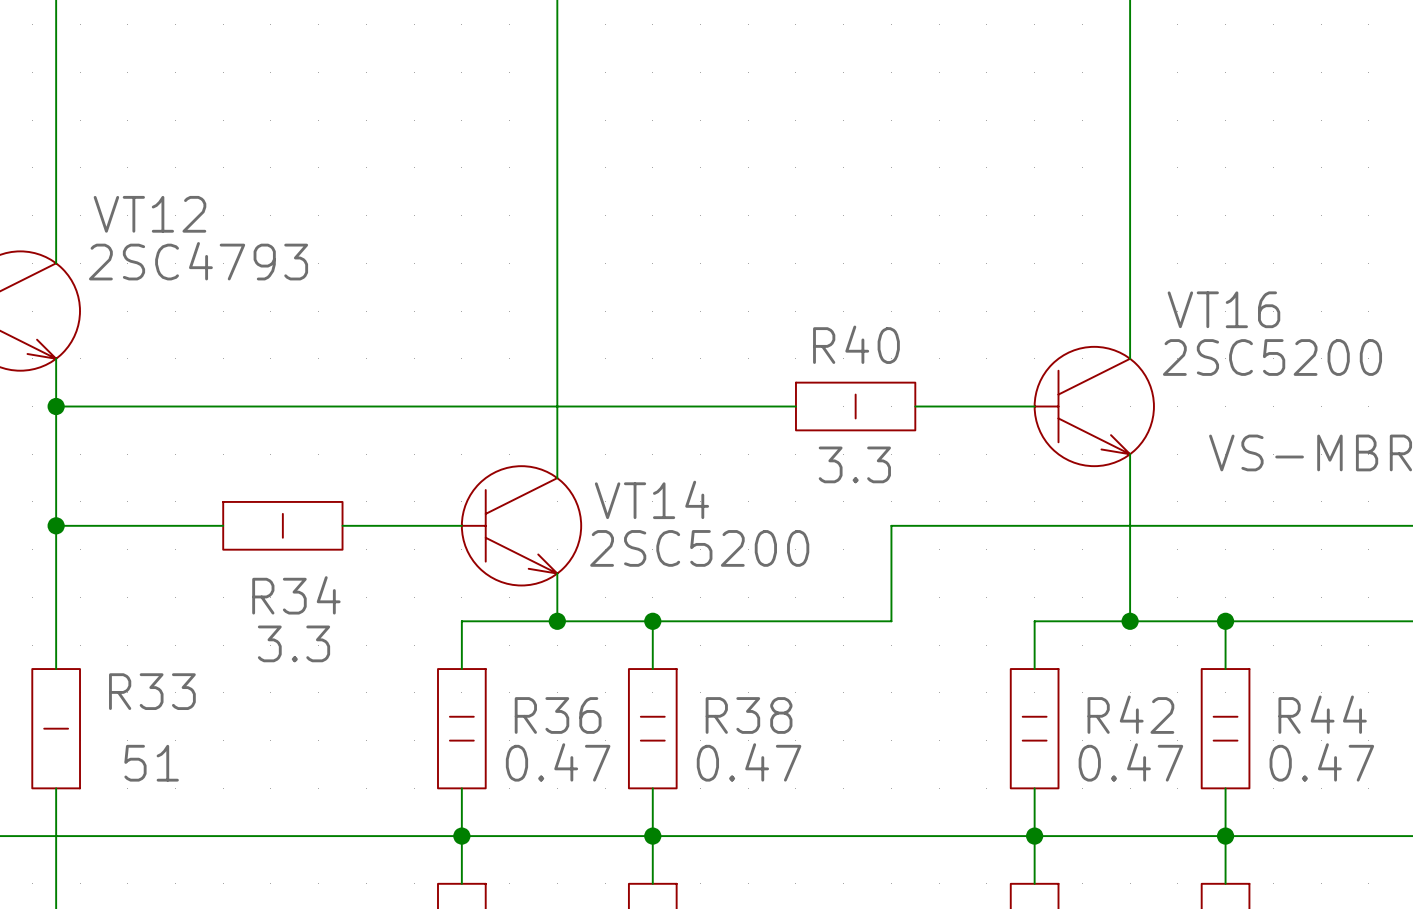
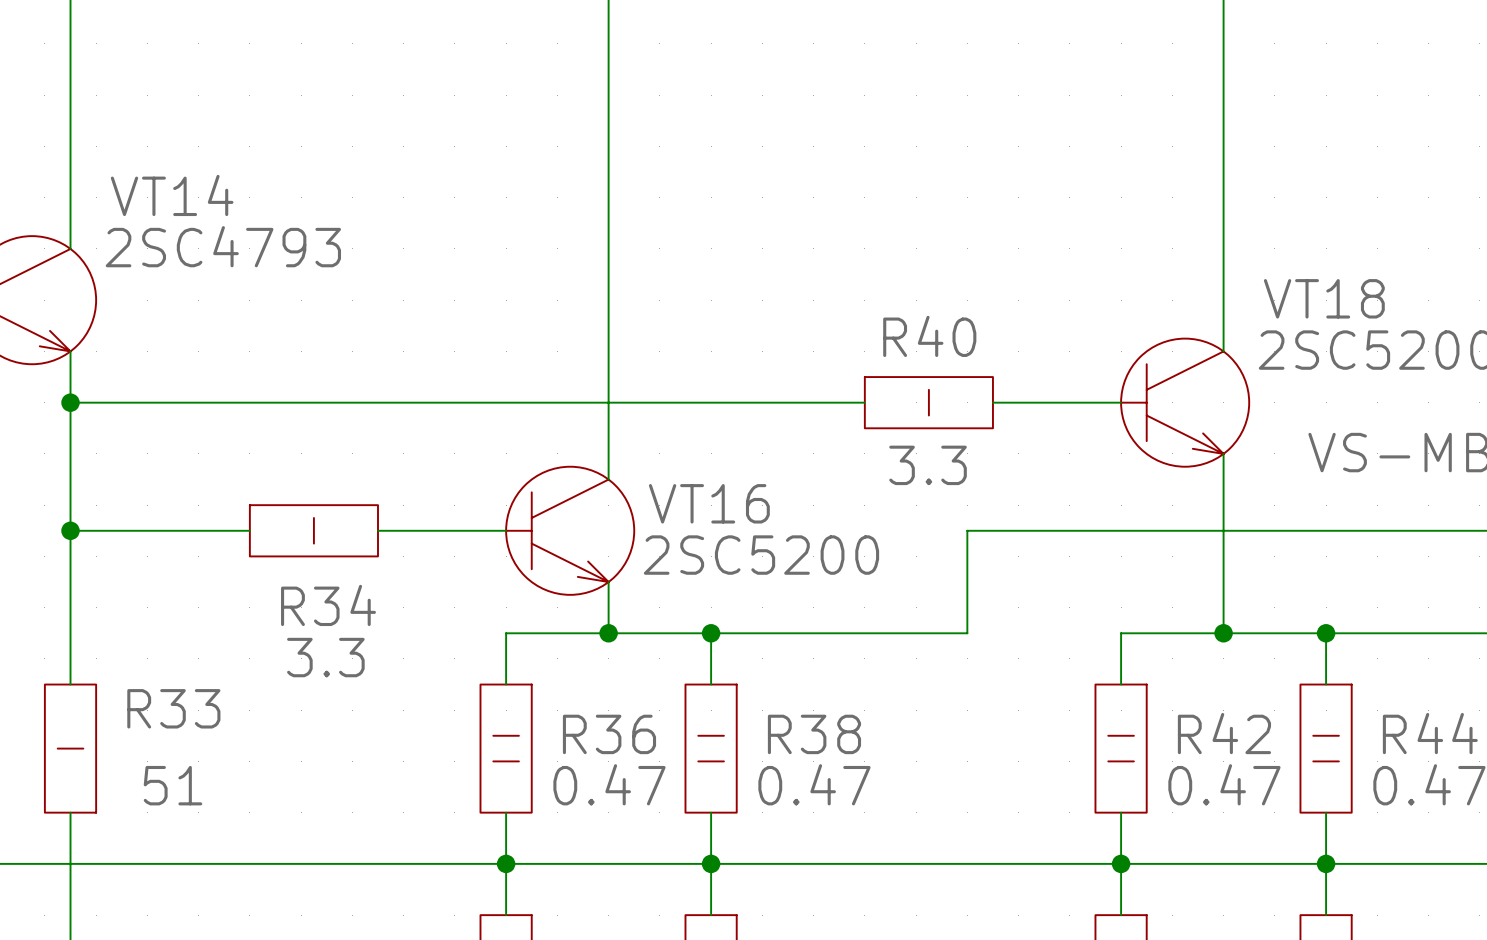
VT12 name: VT12 (149, 214) -> VT14 (172, 195)
VT16 name: VT16 (1223, 309) -> VT18 (1324, 298)
VT14 name: VT14 (651, 499) -> VT16 (709, 503)

